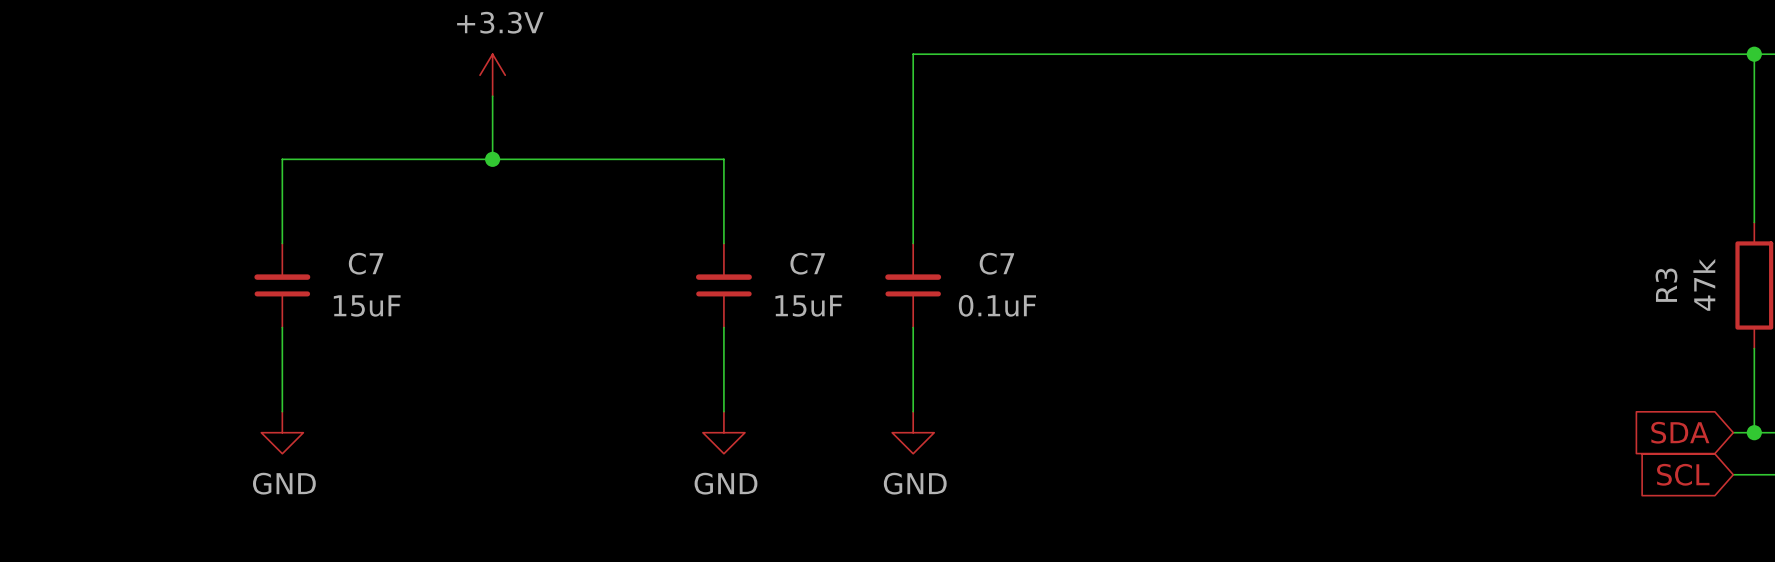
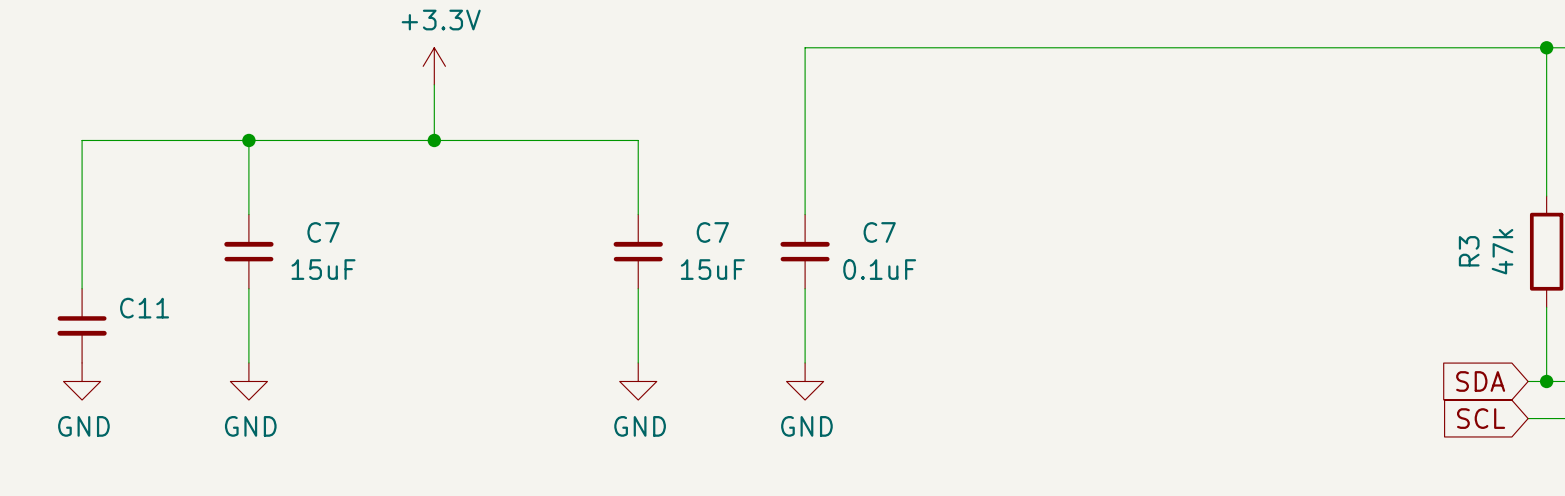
wire: none -> (248, 140) (82, 140) (82, 288)
junction: none -> (248, 140)
C11: none -> (82, 325)
power symbol: none -> GND (82, 381)

